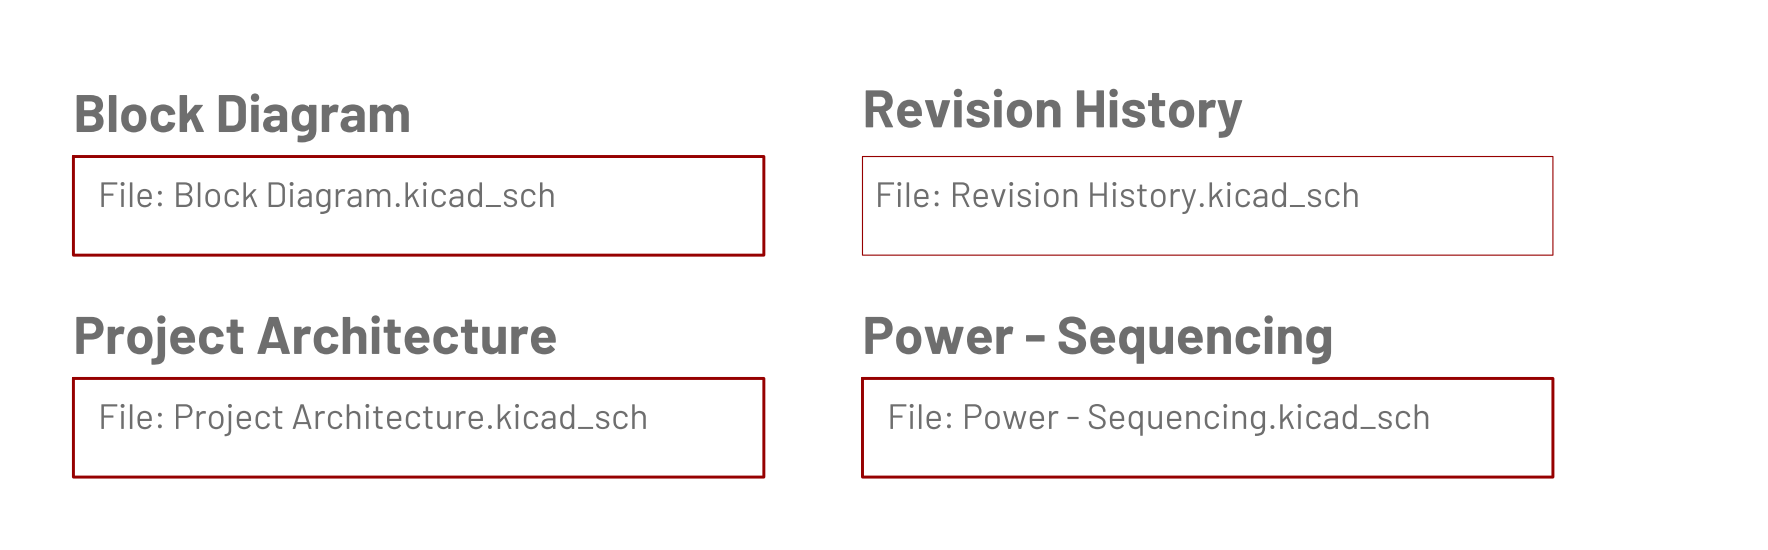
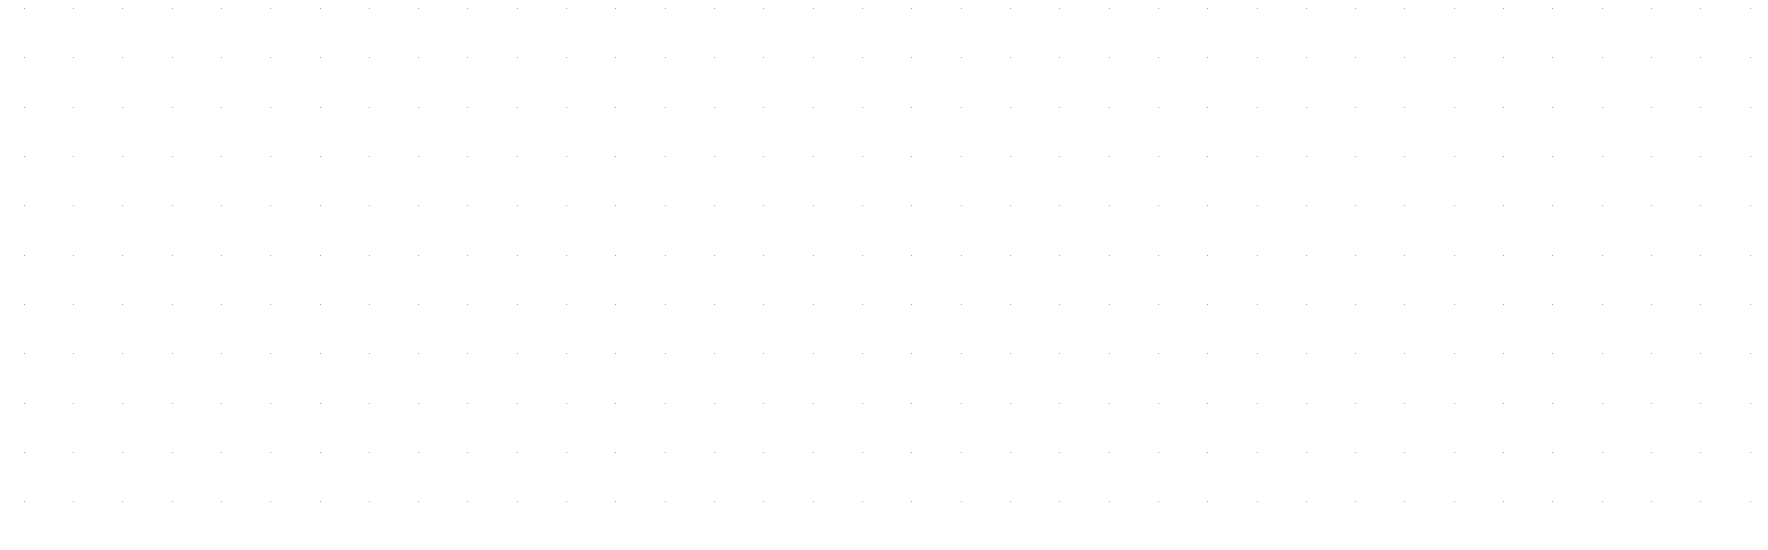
sheet Block Diagram: File: Block Diagram.kicad_sch (418, 205) -> none
sheet Revision History: File: Revision History.kicad_sch (1207, 205) -> none
sheet Project Architecture: File: Project Architecture.kicad_sch (418, 427) -> none
sheet Power - Sequencing: File: Power - Sequencing.kicad_sch (1207, 427) -> none

